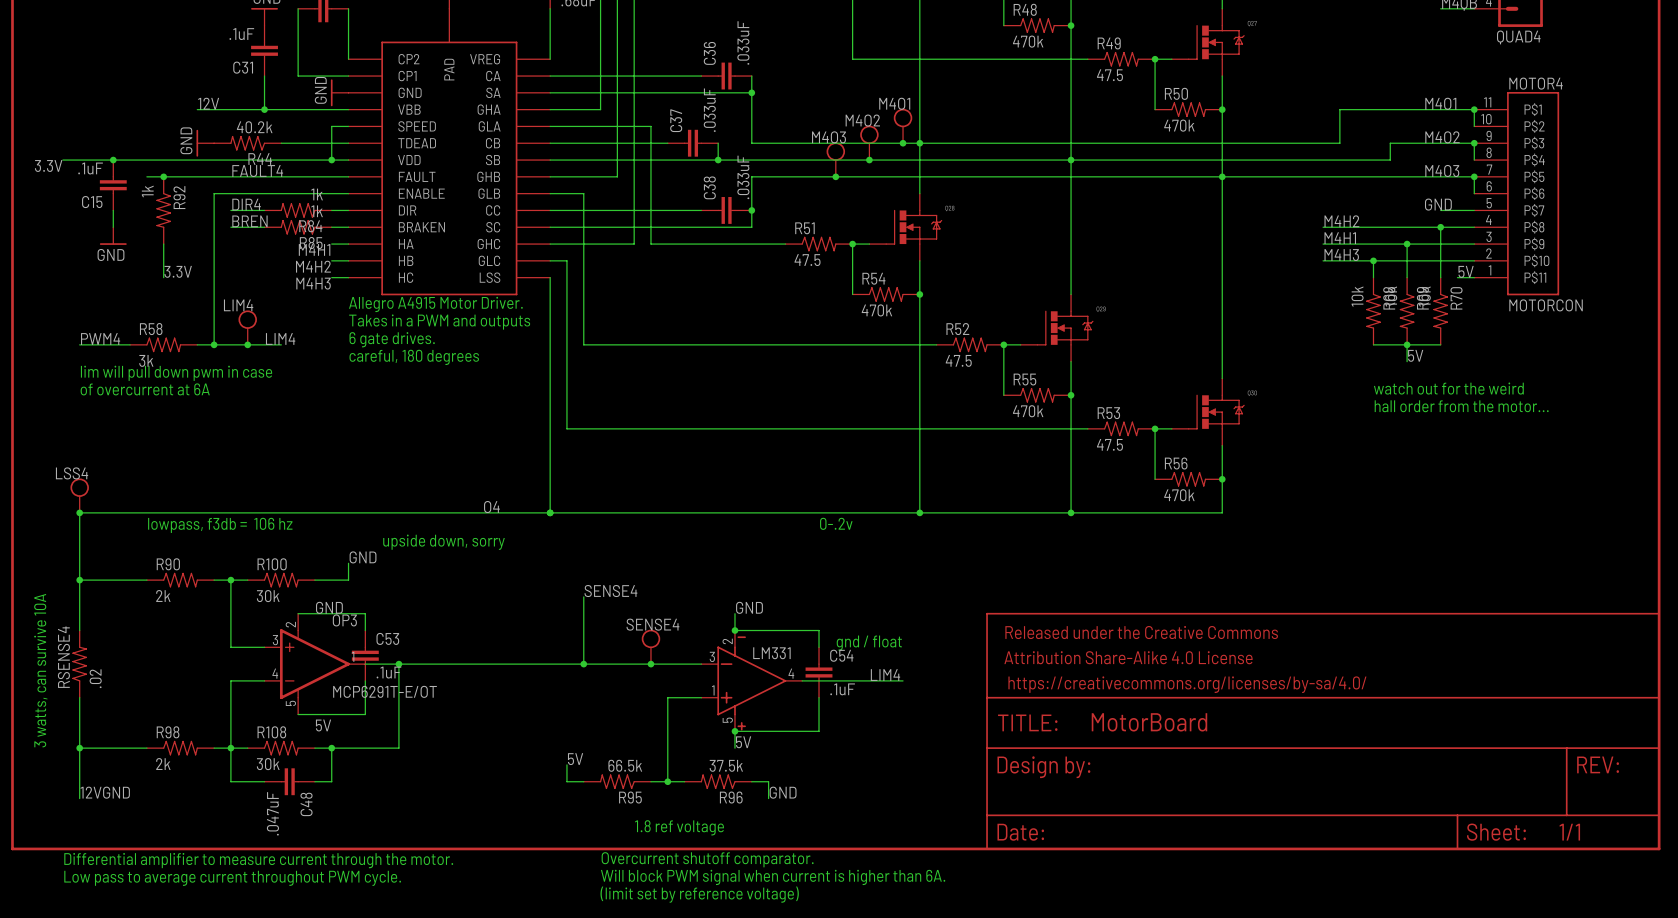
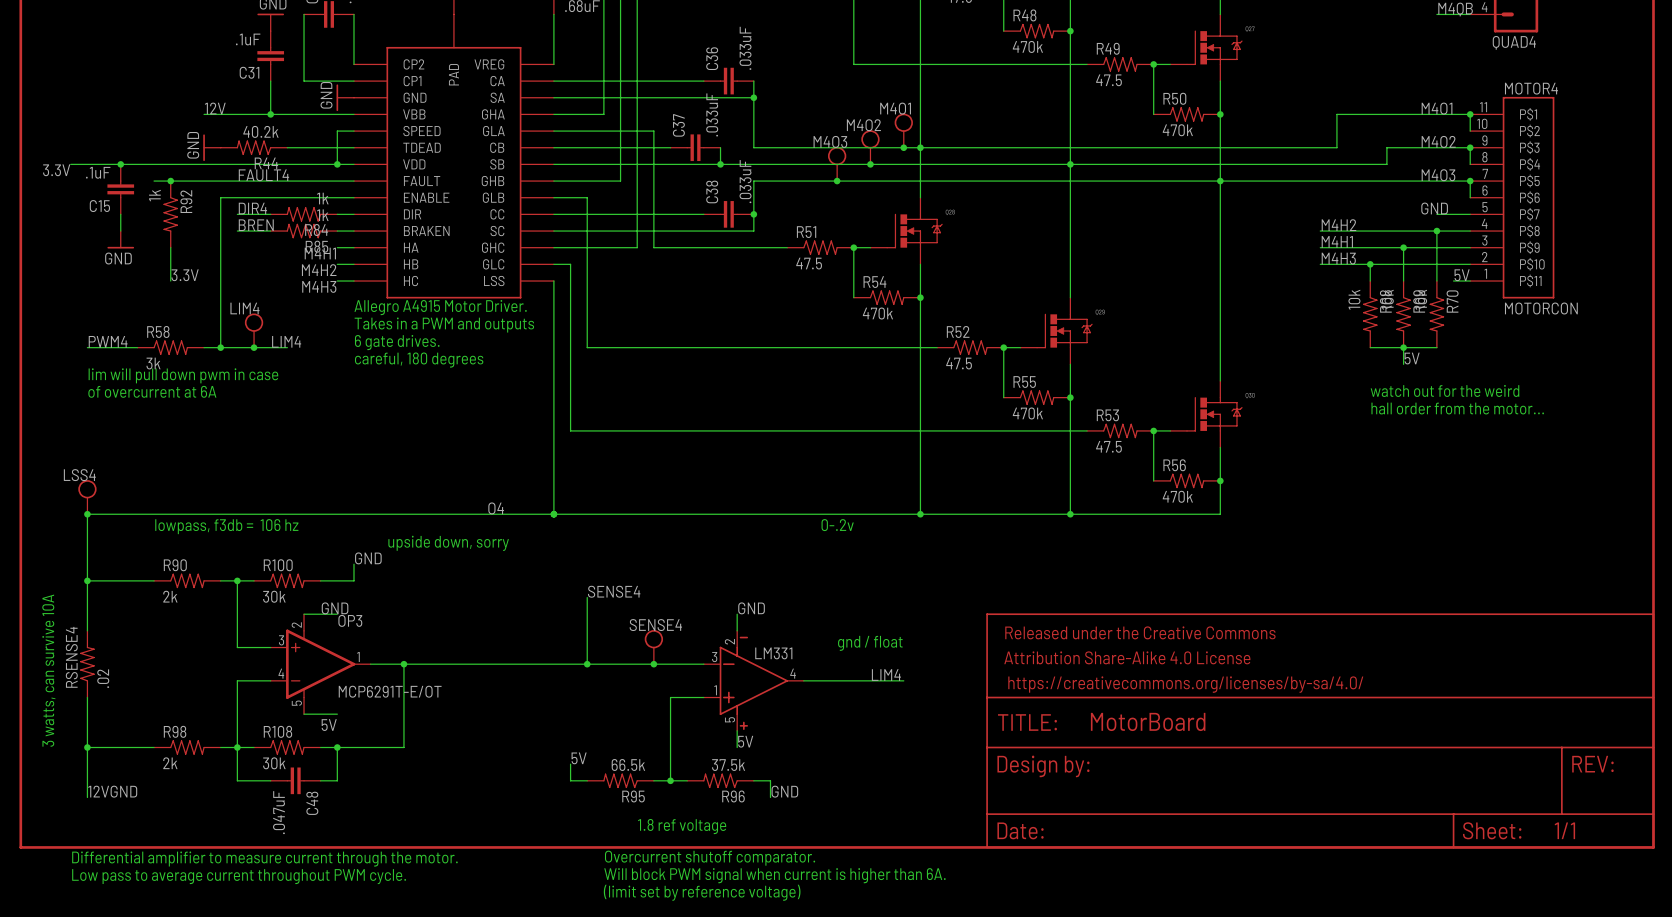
wire: (331, 613) (365, 613) (365, 630) -> none
wire: (734, 630) (819, 630) (819, 647) -> none
junction: (734, 630) -> none
C53: .1uF (365, 655) -> none
C54: .1uF (819, 672) -> none
wire: (365, 680) (365, 714) (331, 714) -> none
wire: (819, 697) (819, 731) (734, 731) -> none
junction: (734, 731) -> none

